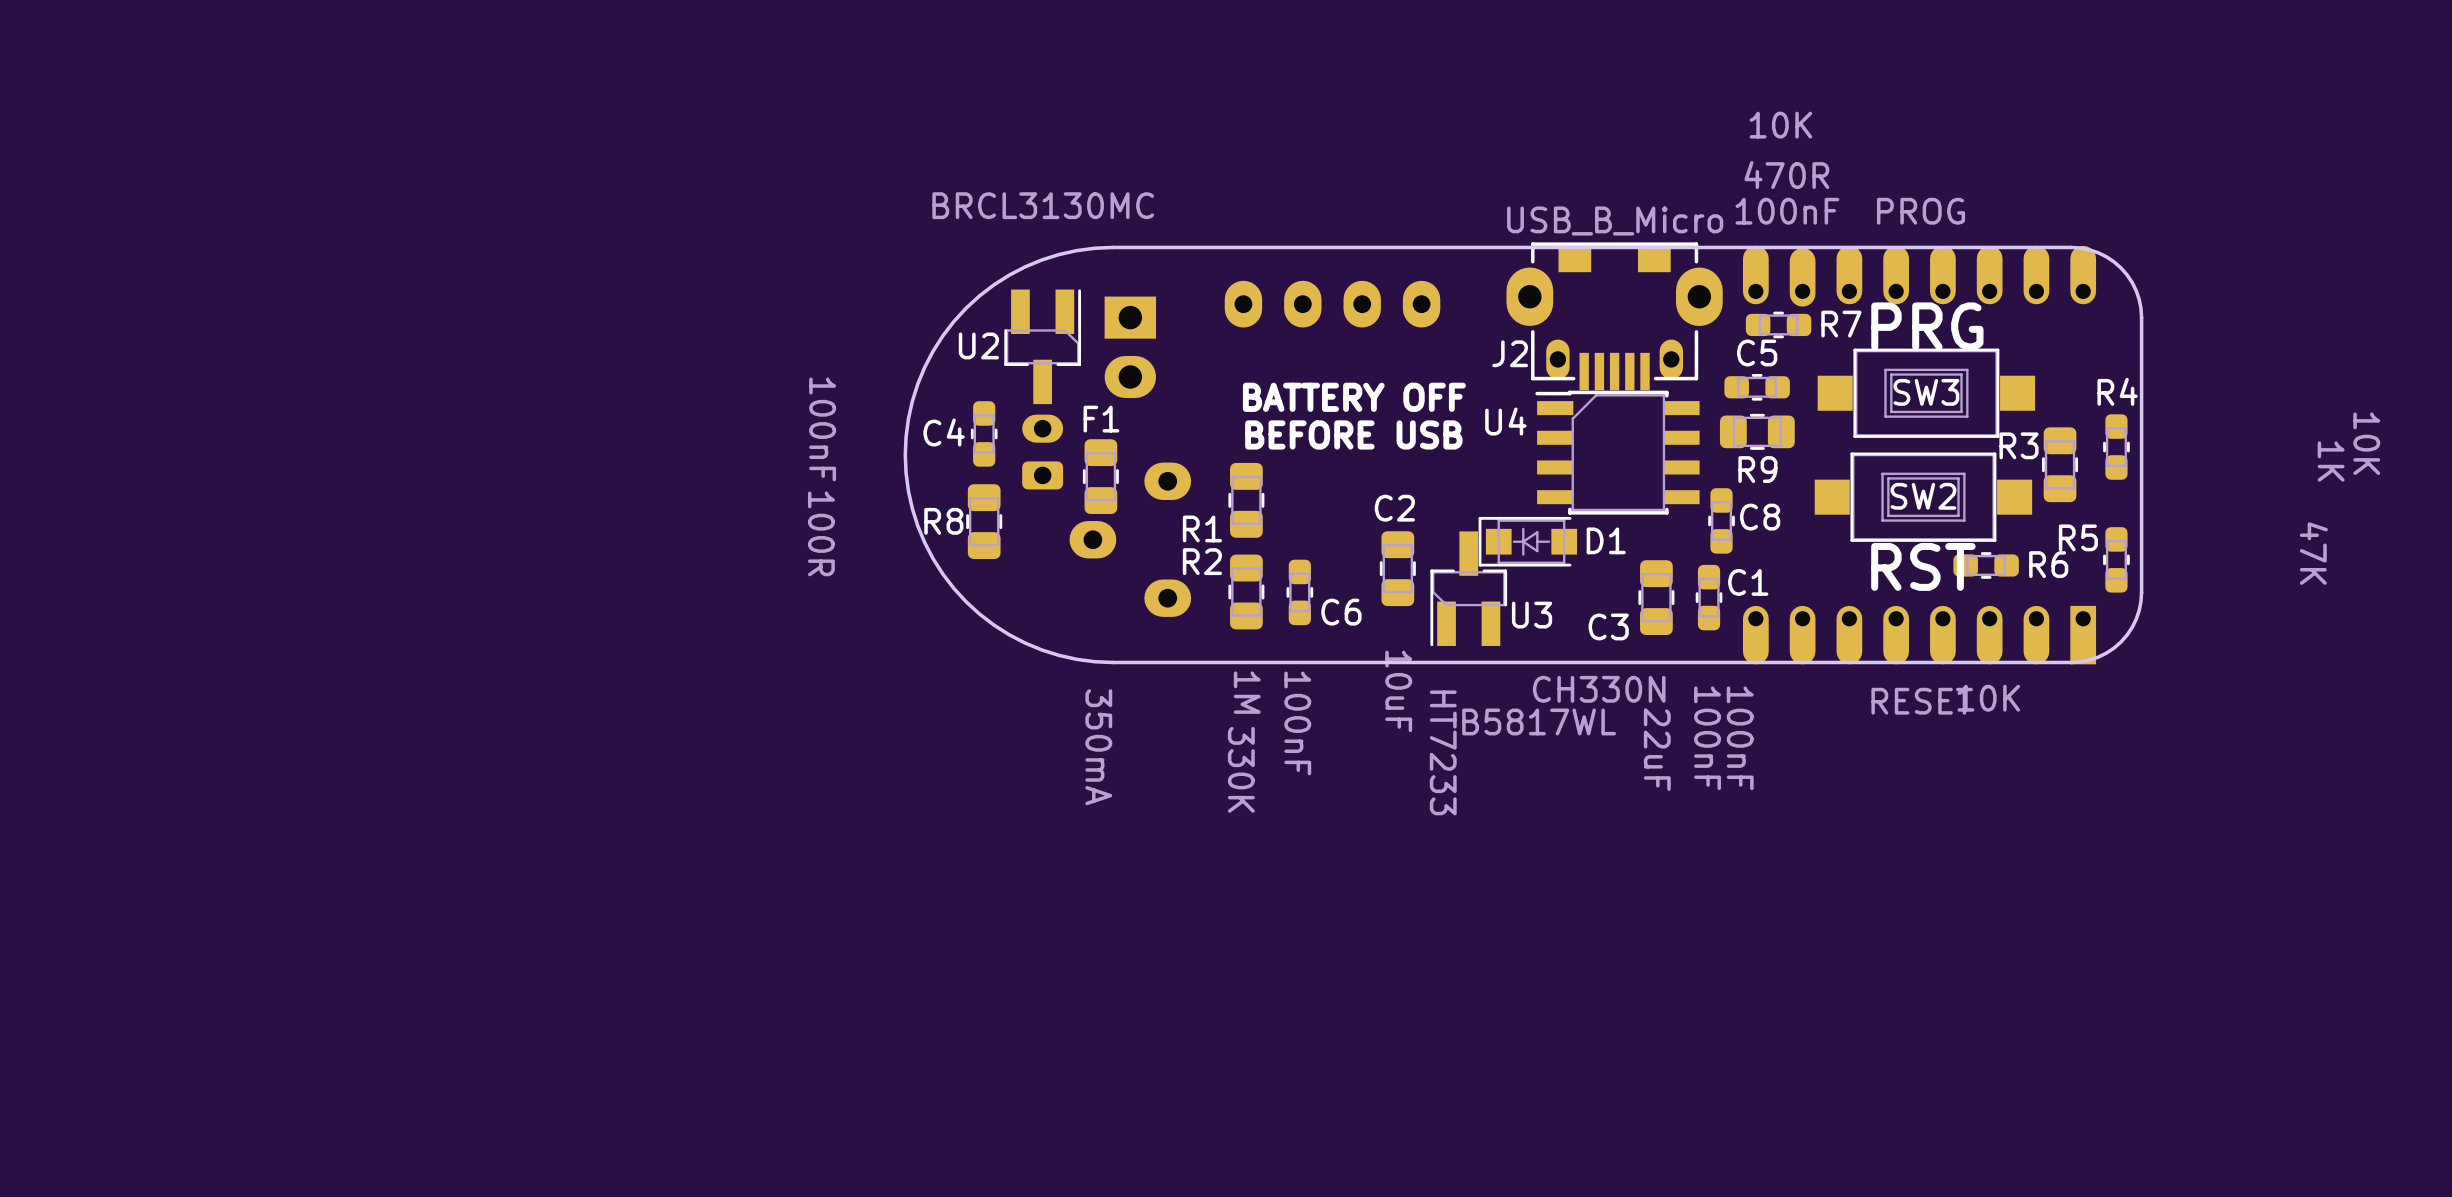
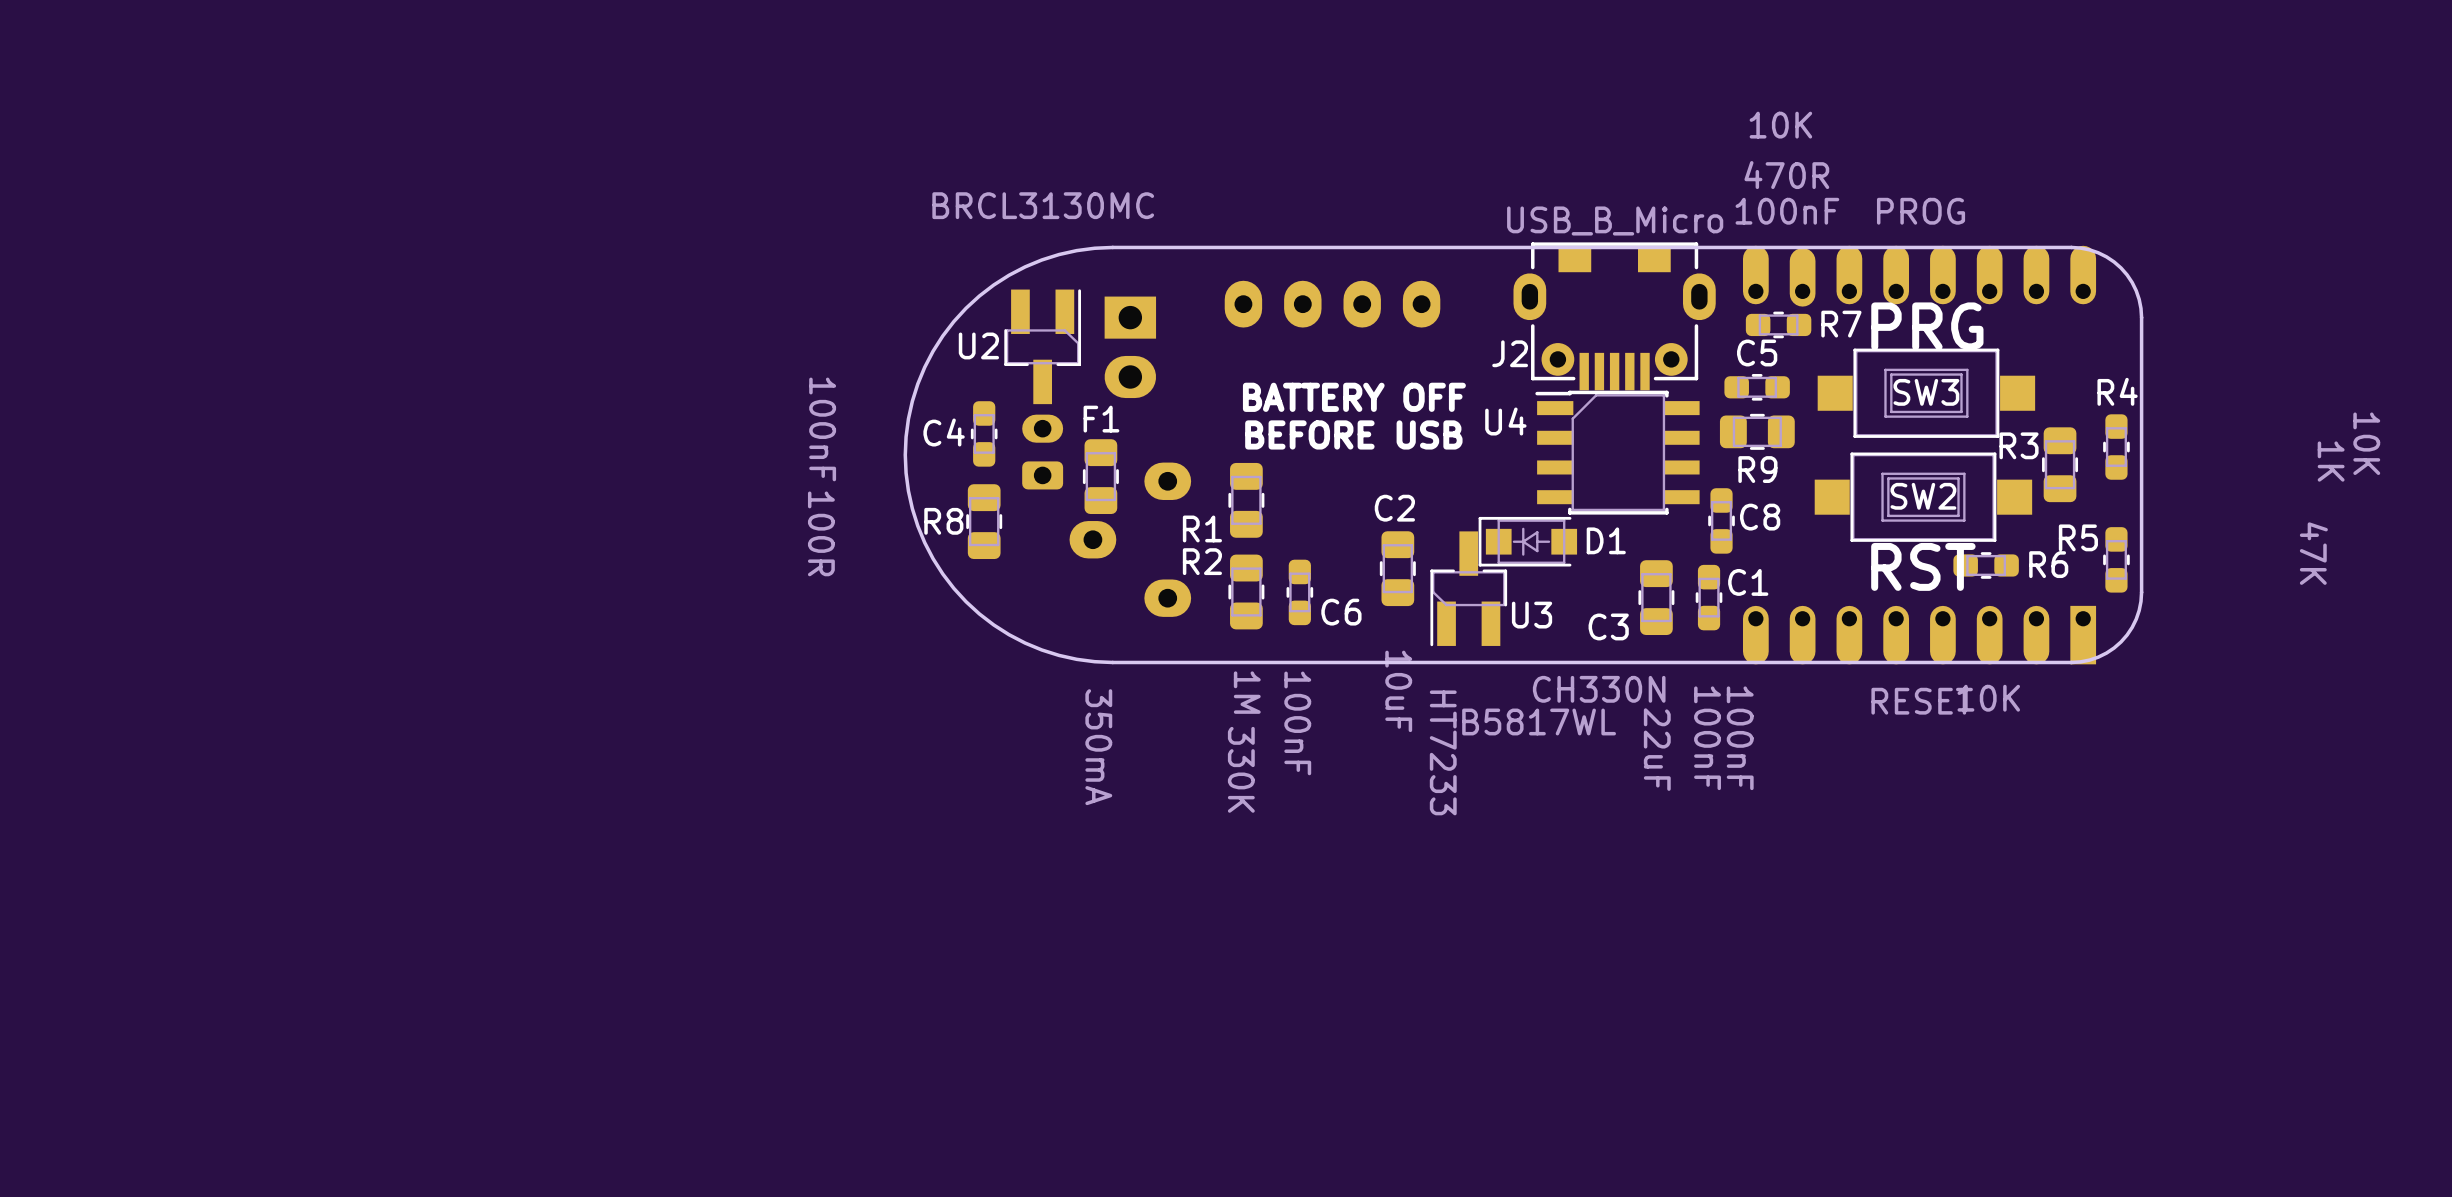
J2 footprint: [1506, 242, 1723, 391] -> [1513, 242, 1716, 391]

